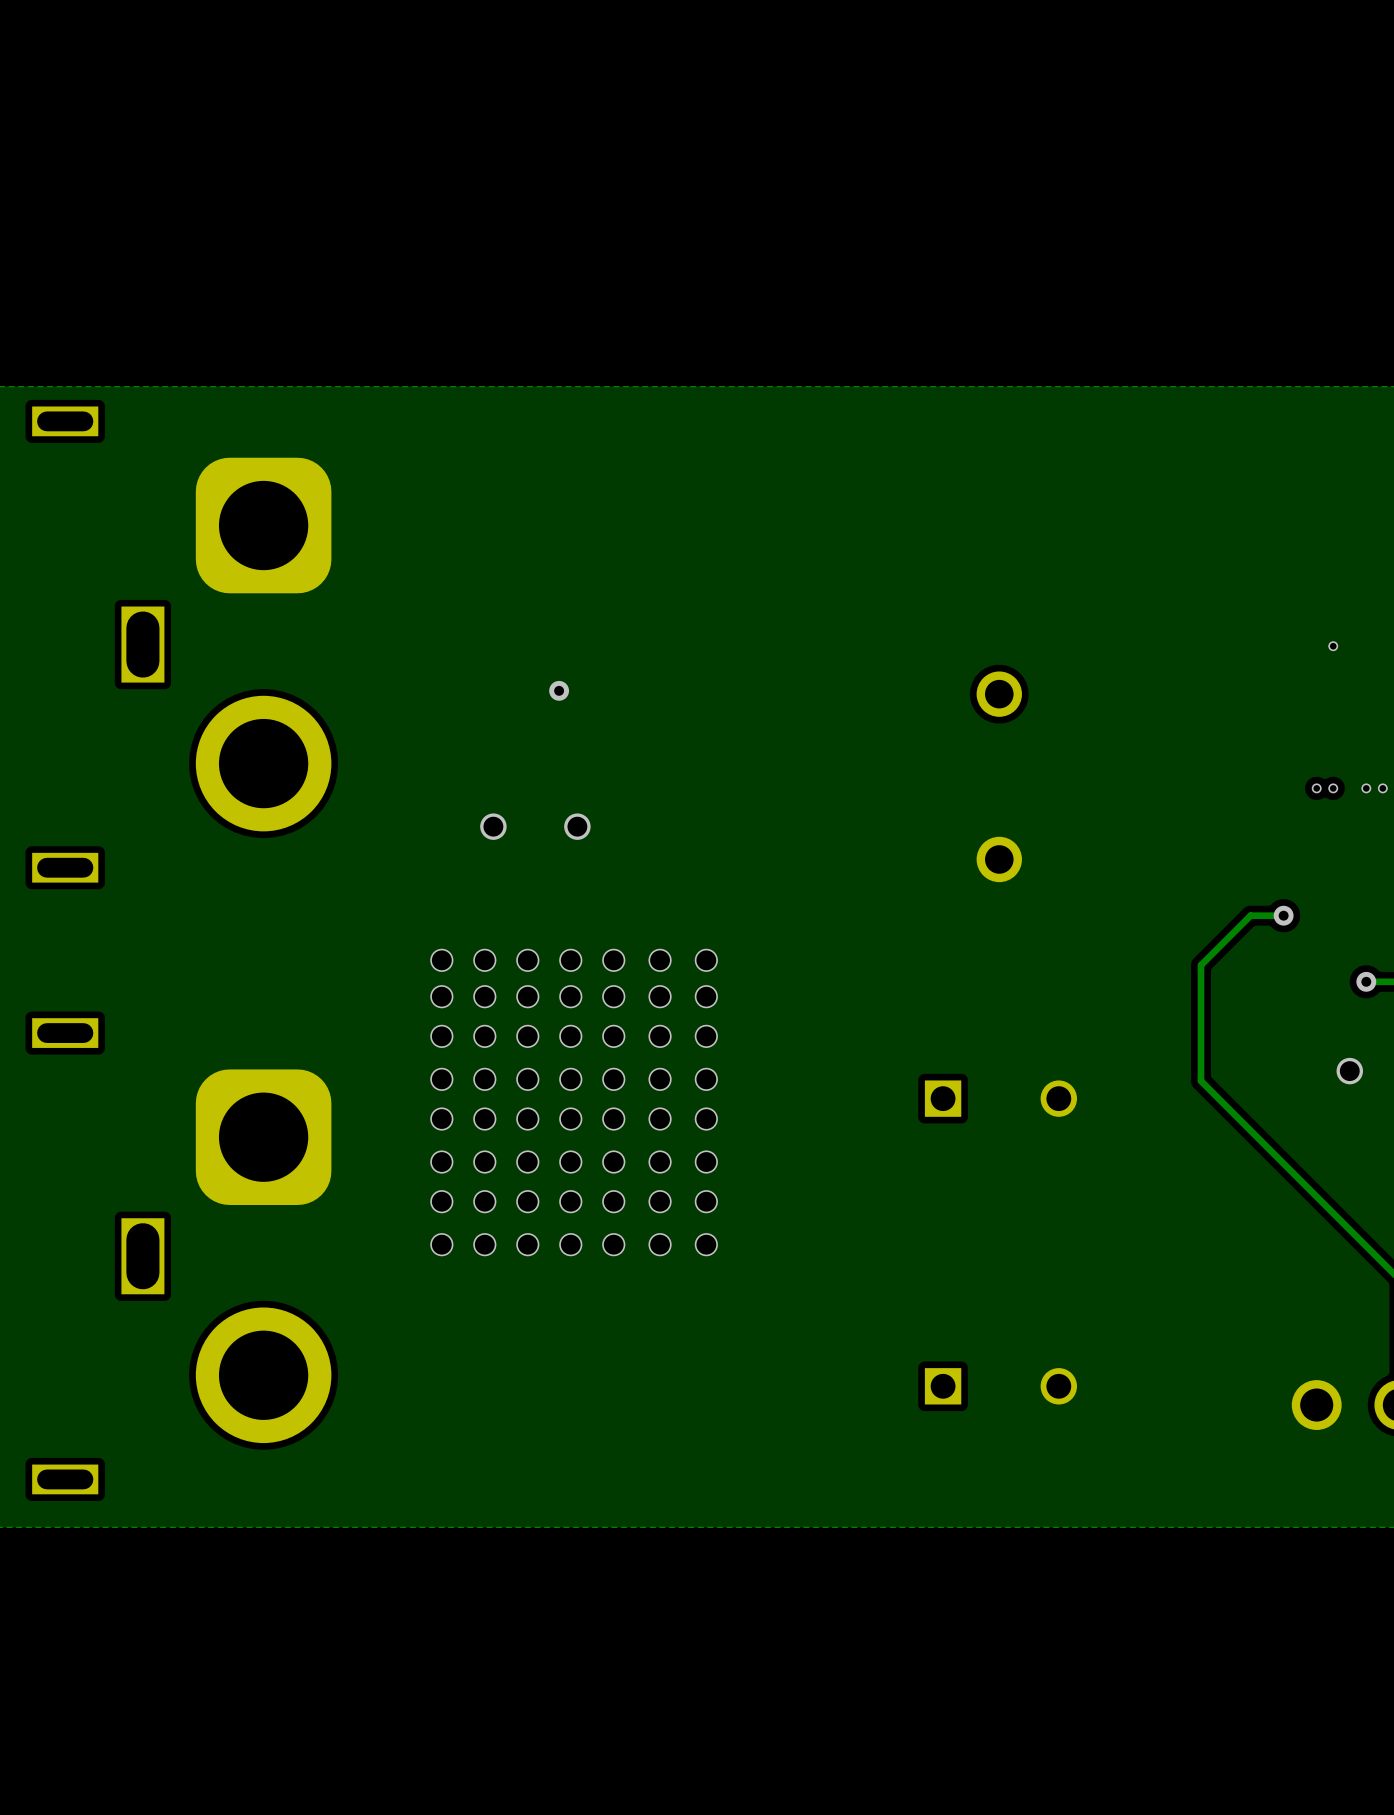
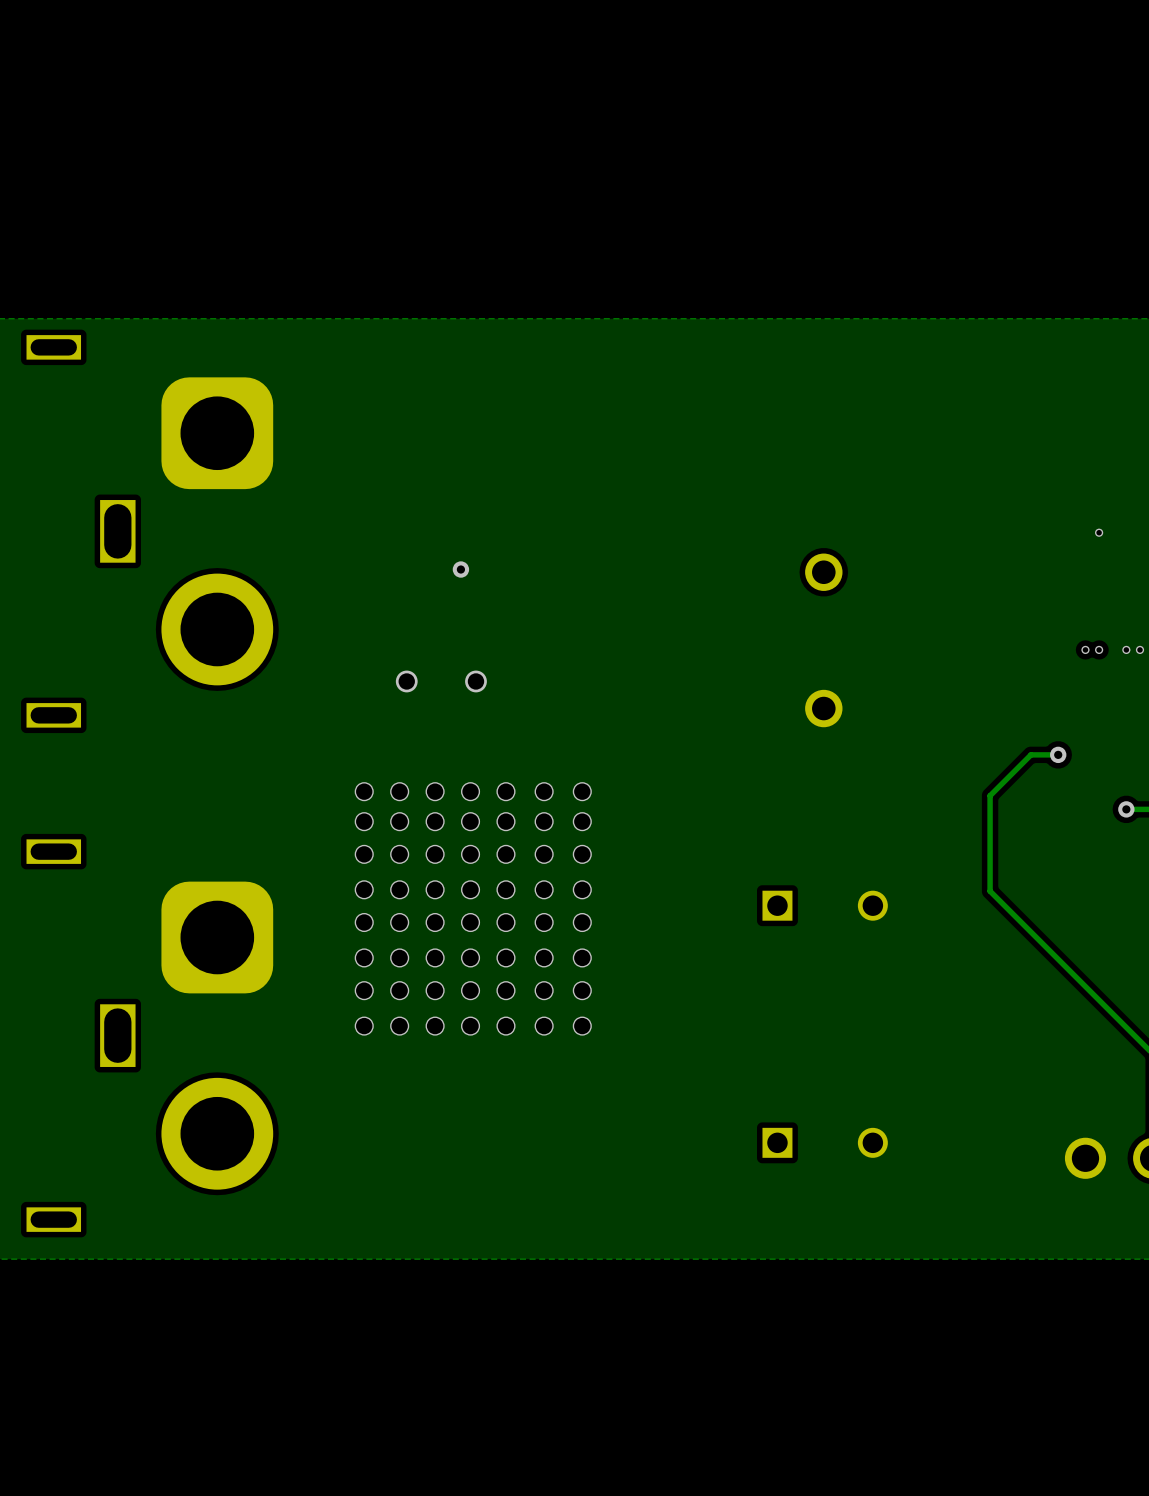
via: (1349, 1071) -> none

